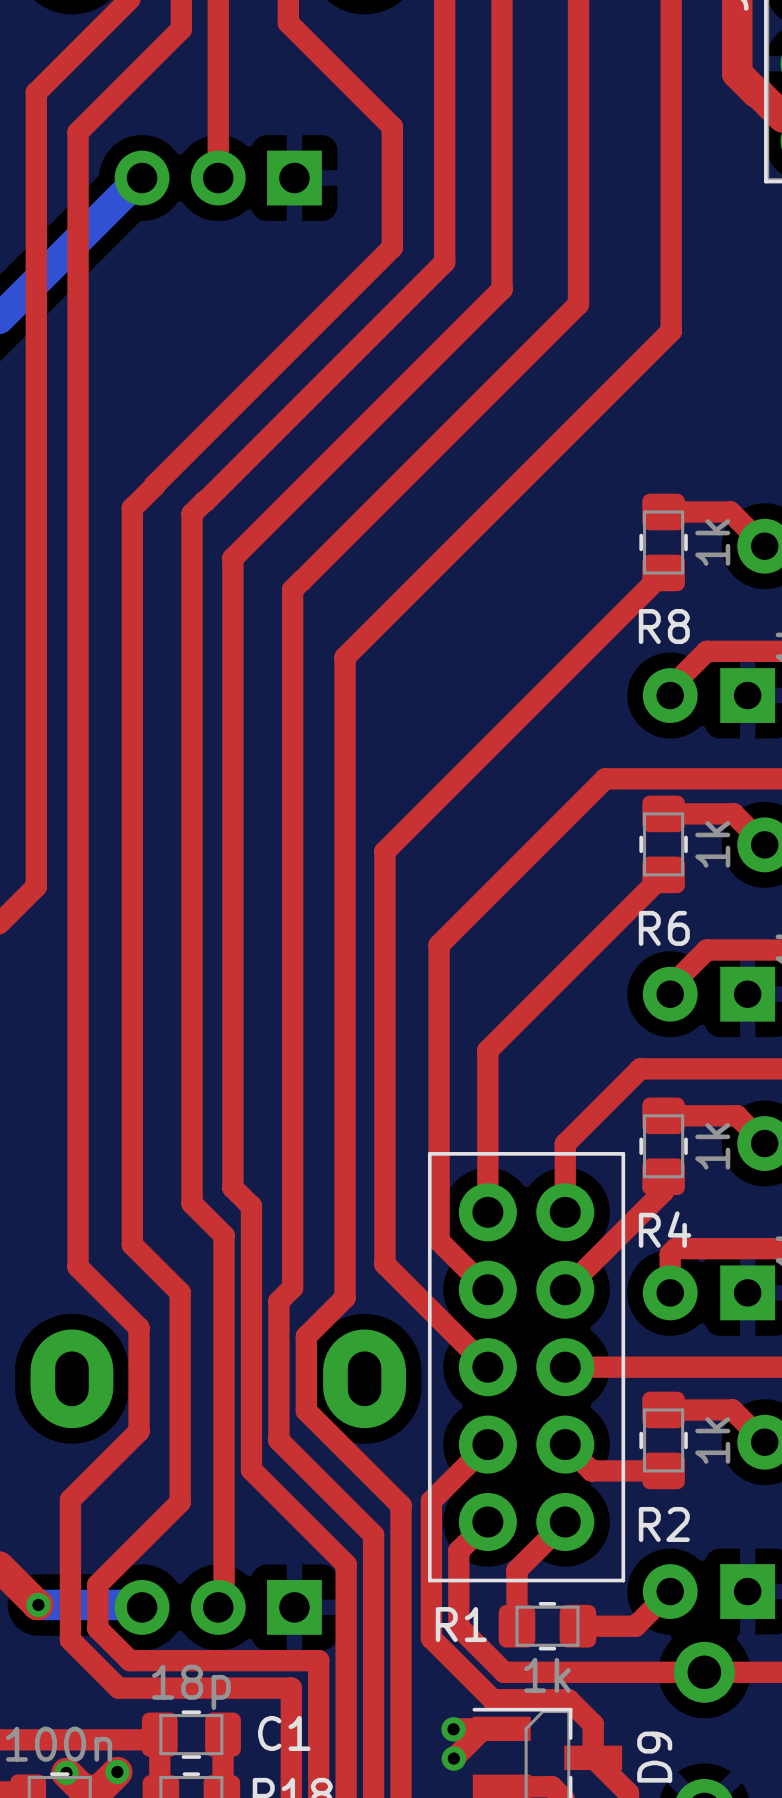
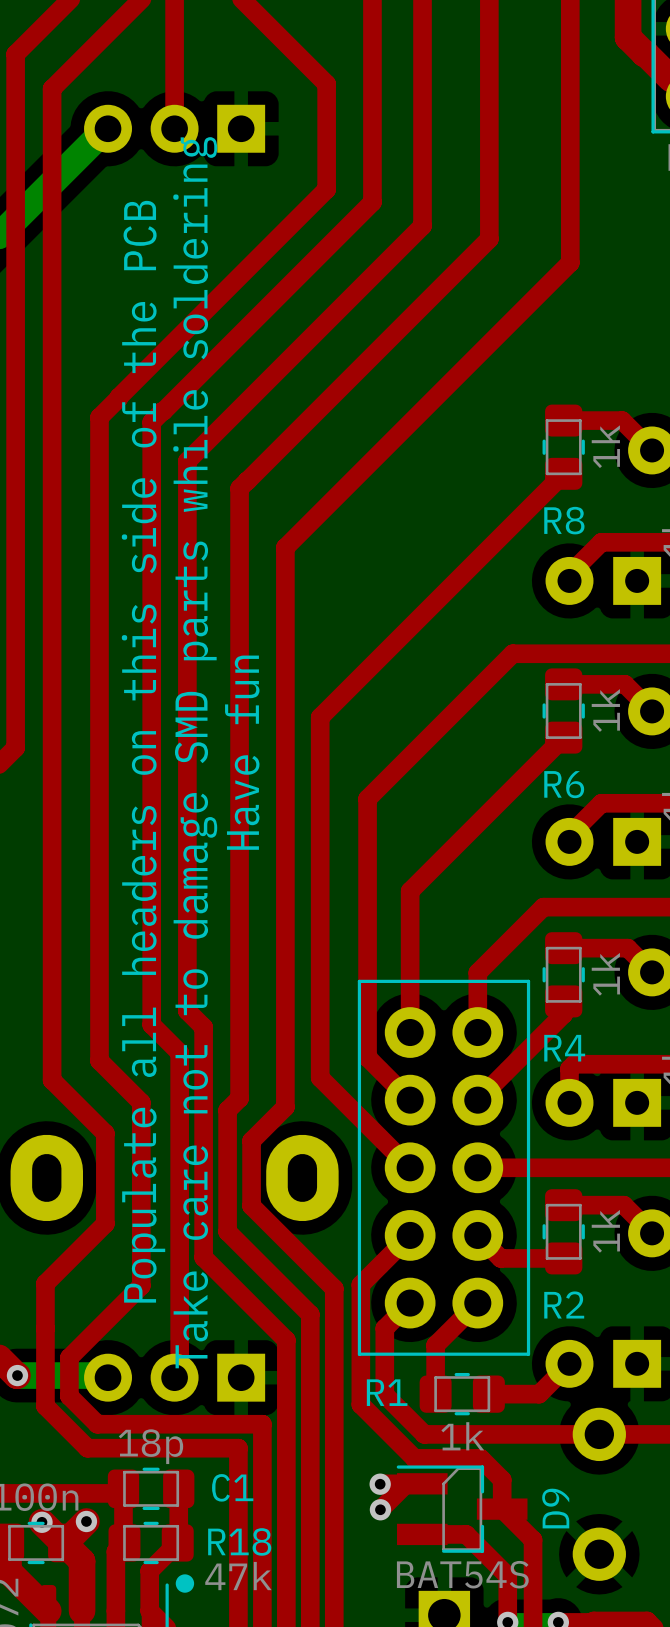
text: none -> Populate all headers on this side of the PCB (143, 751)
text: none -> Have fun (242, 752)
text: none -> Take care not to damage SMD parts while soldering (195, 752)

